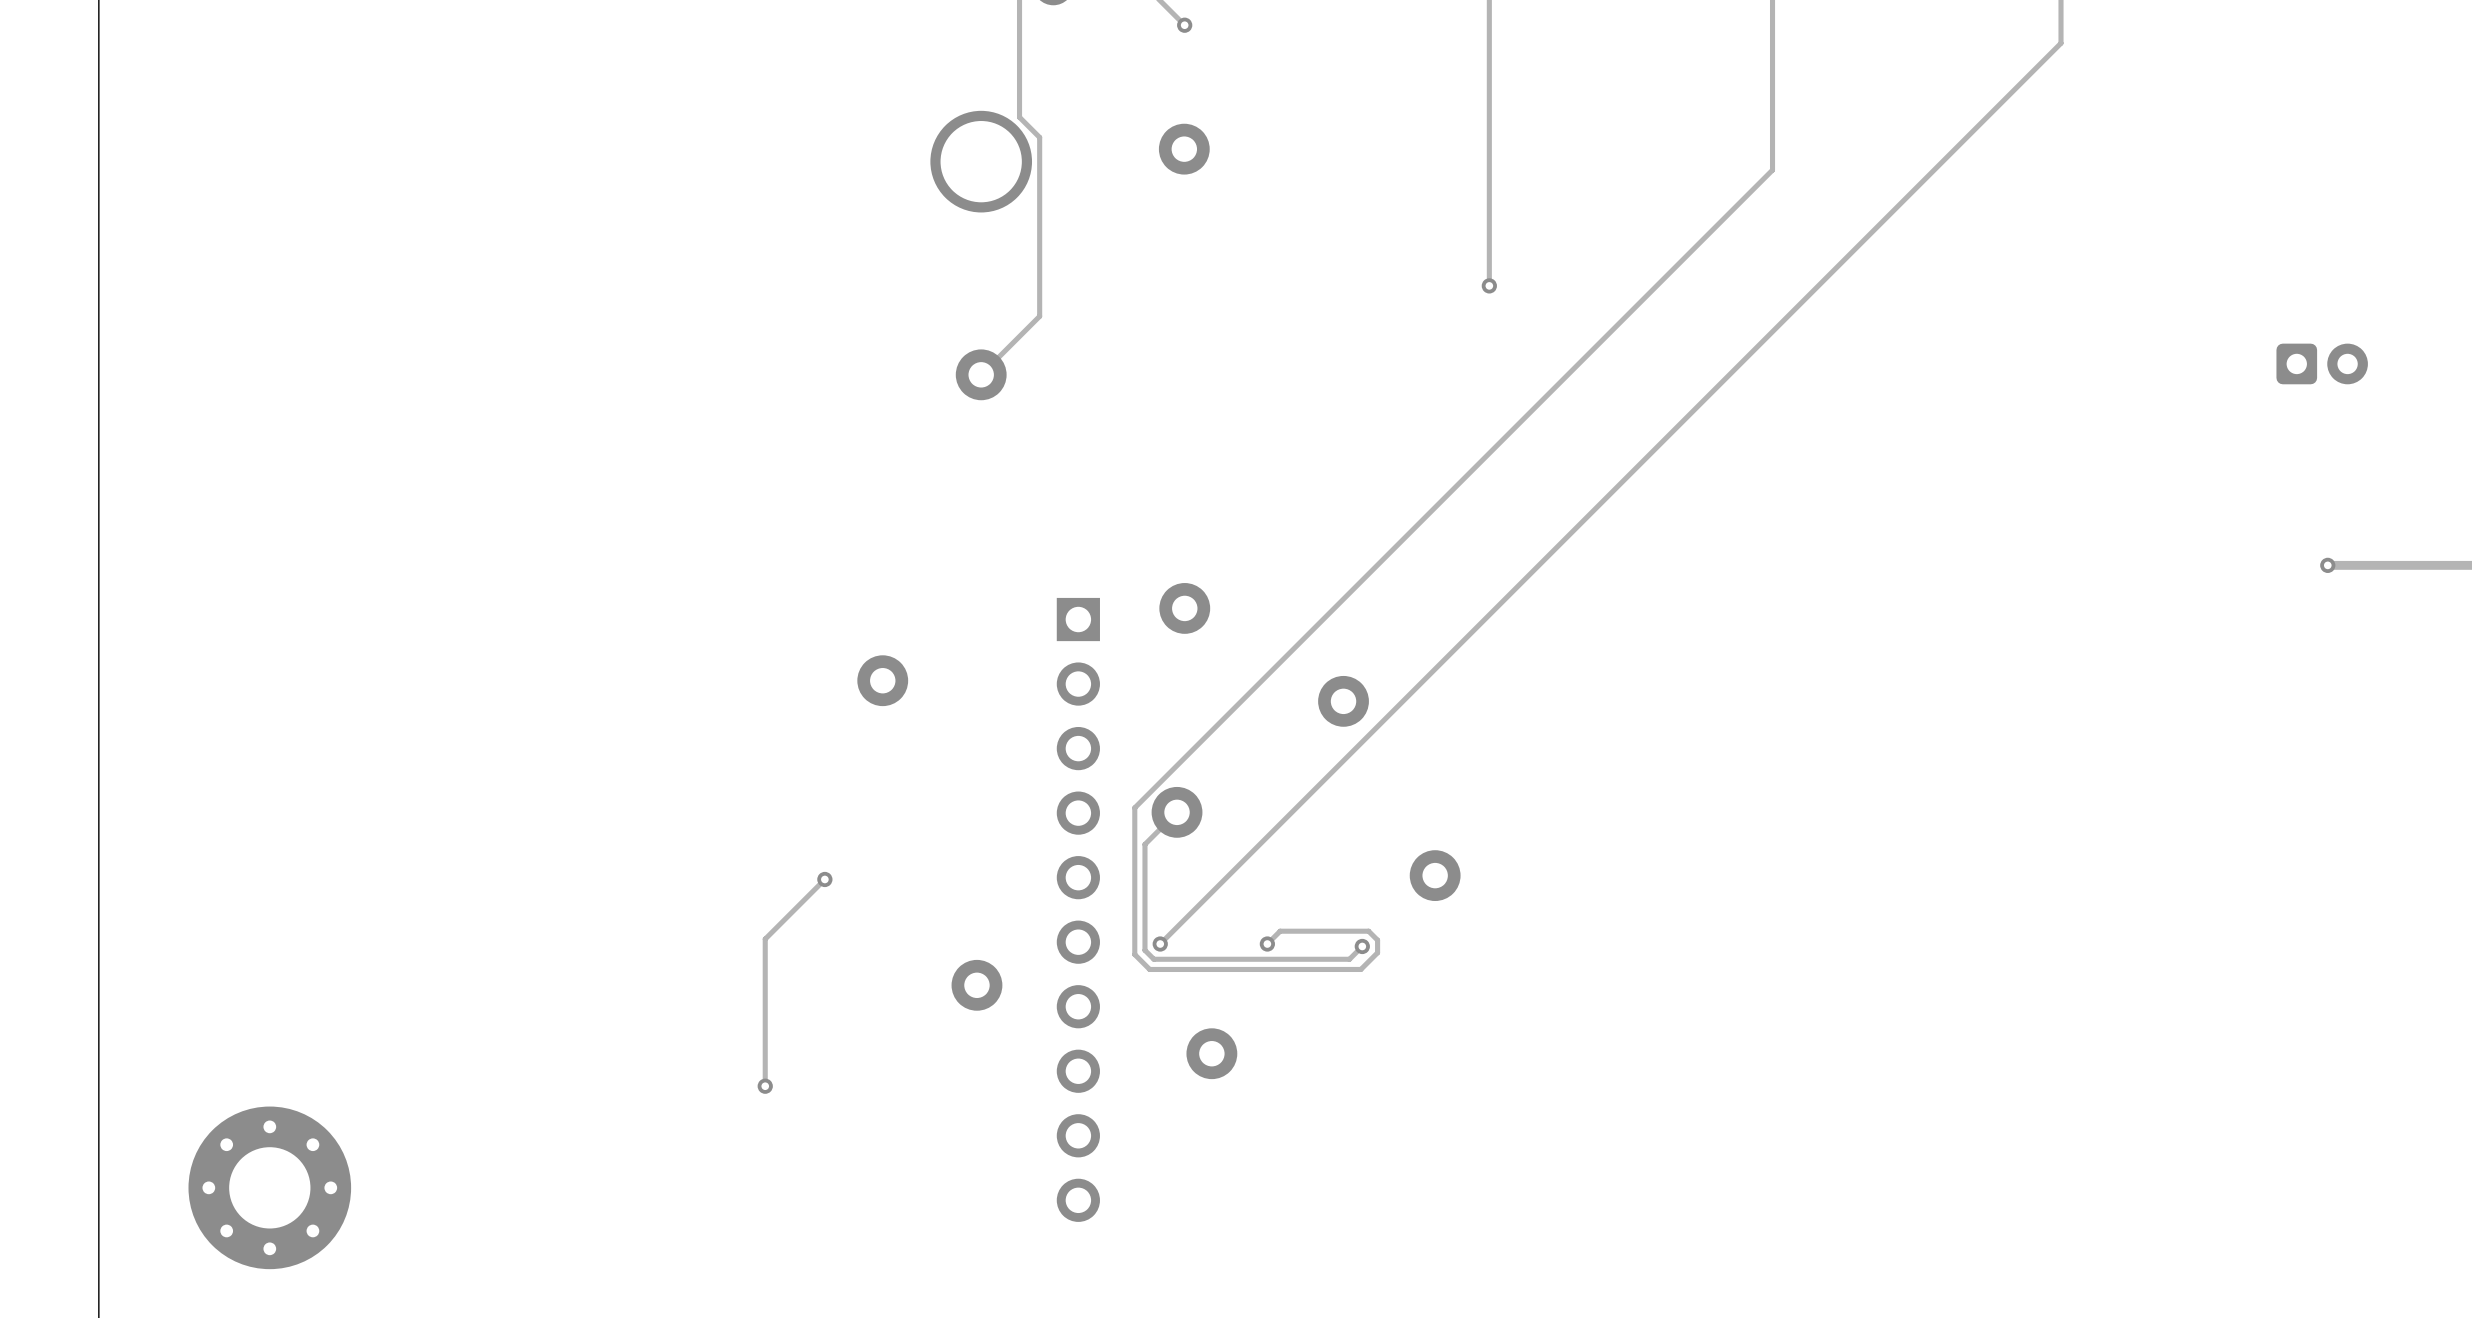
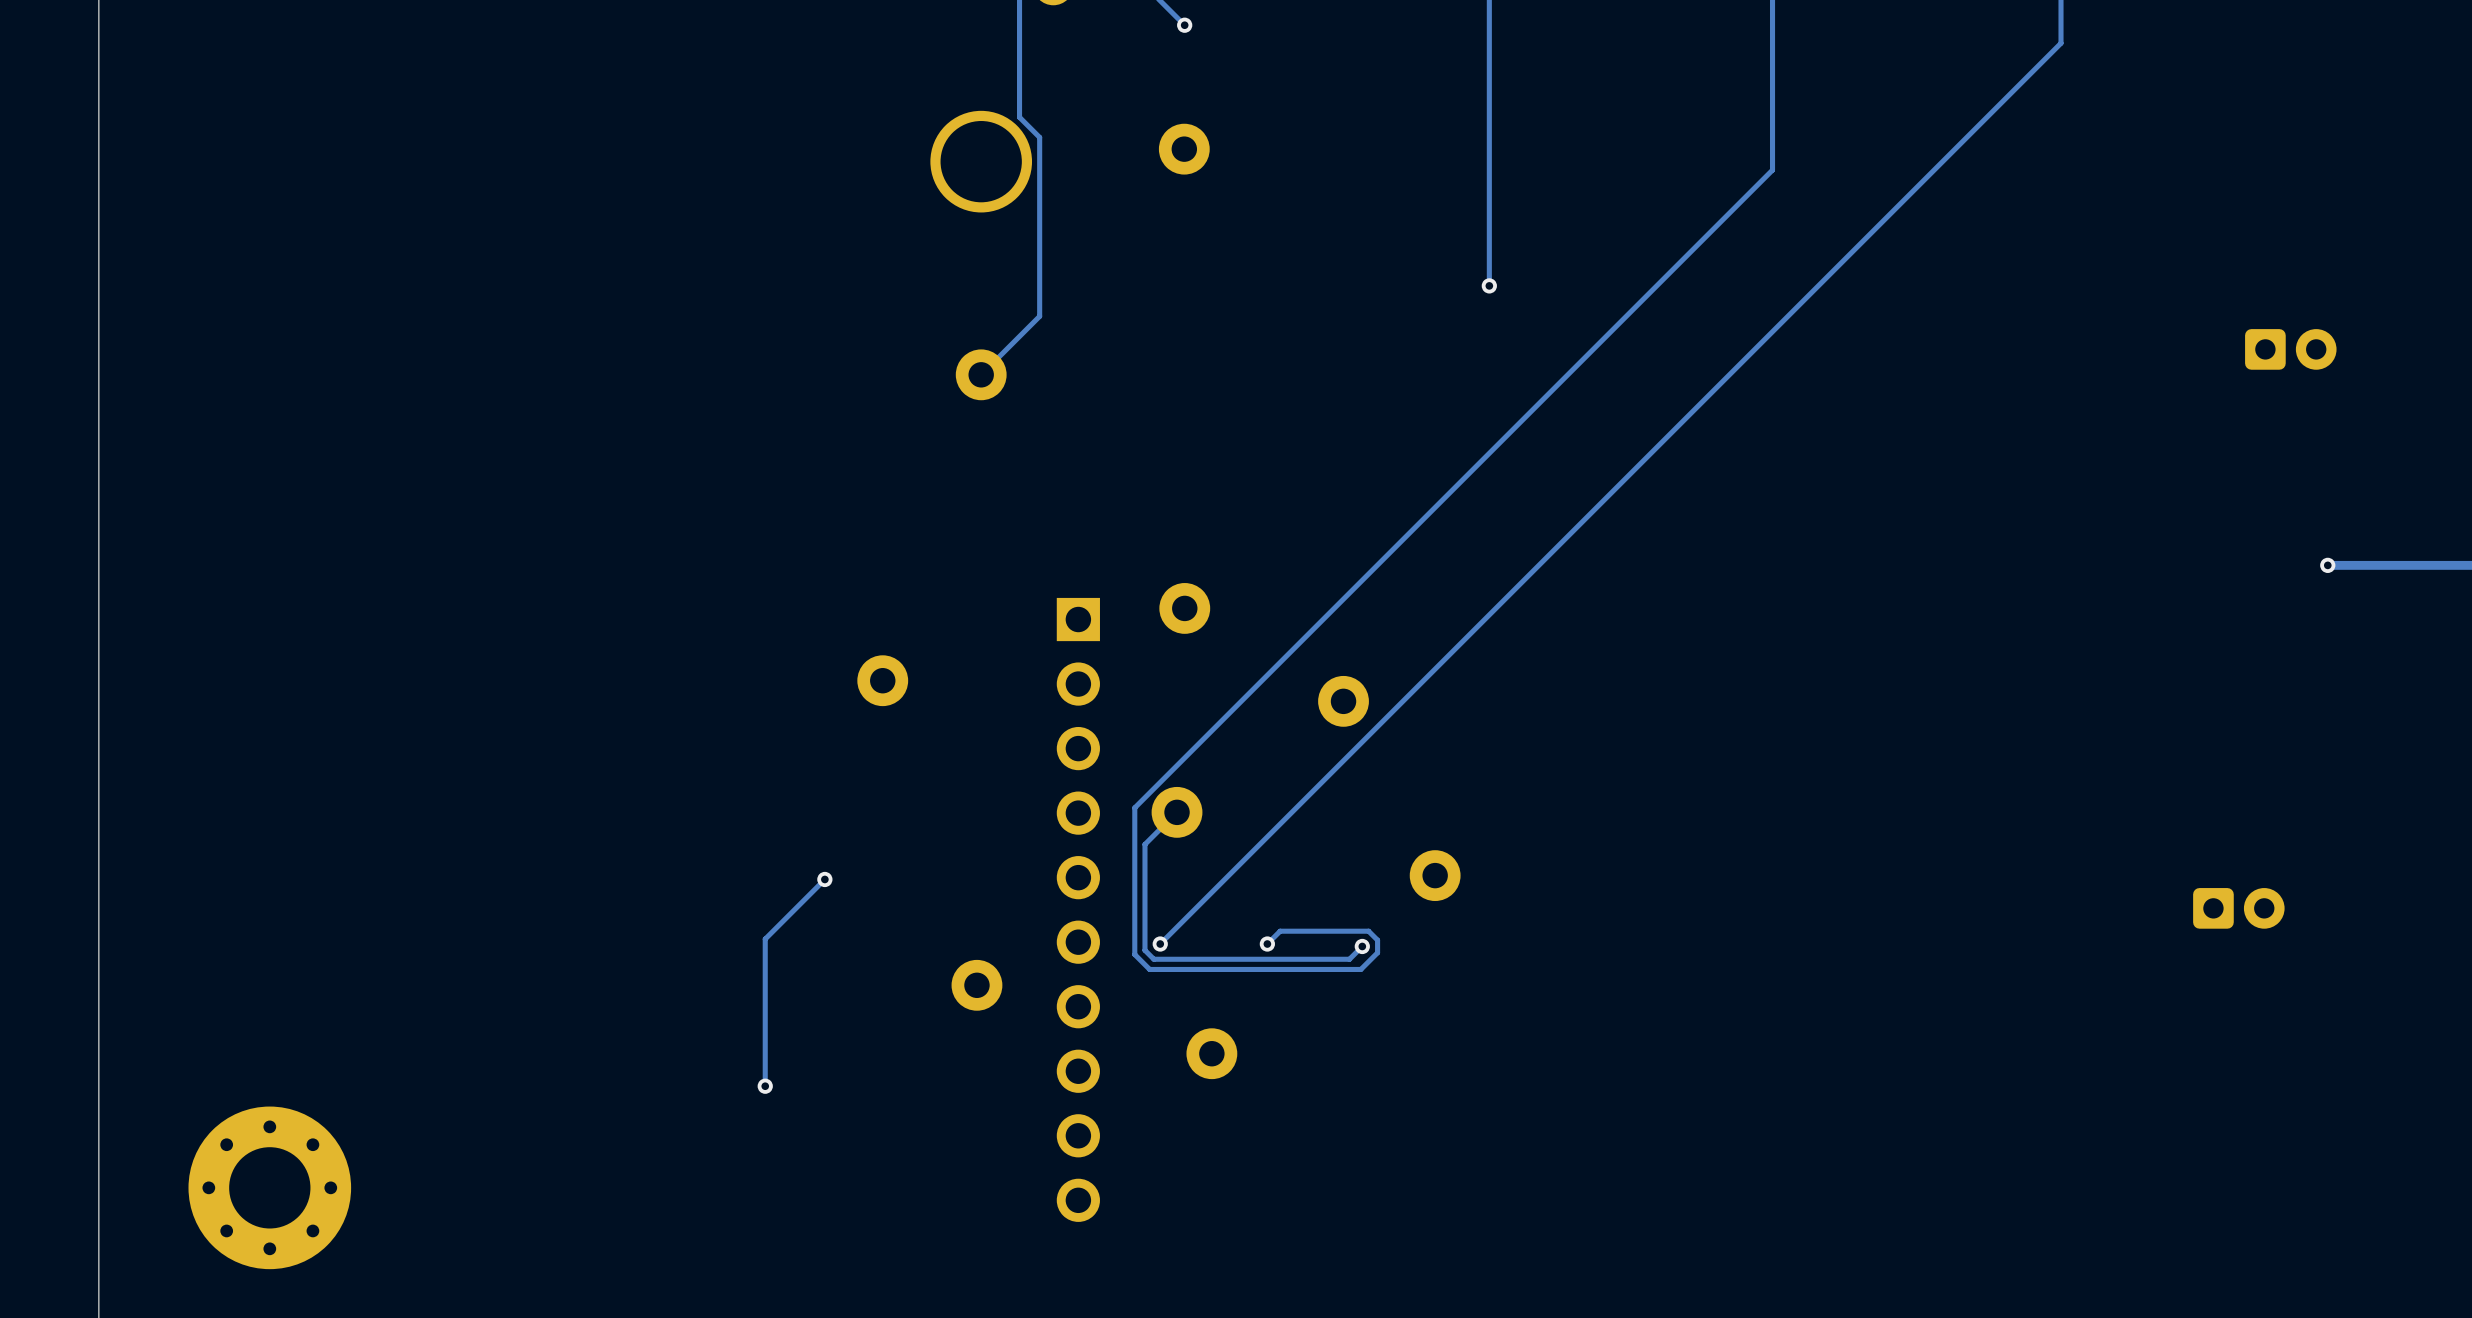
part position: (2322, 363) -> (2290, 349)
part: none -> (2238, 908)

